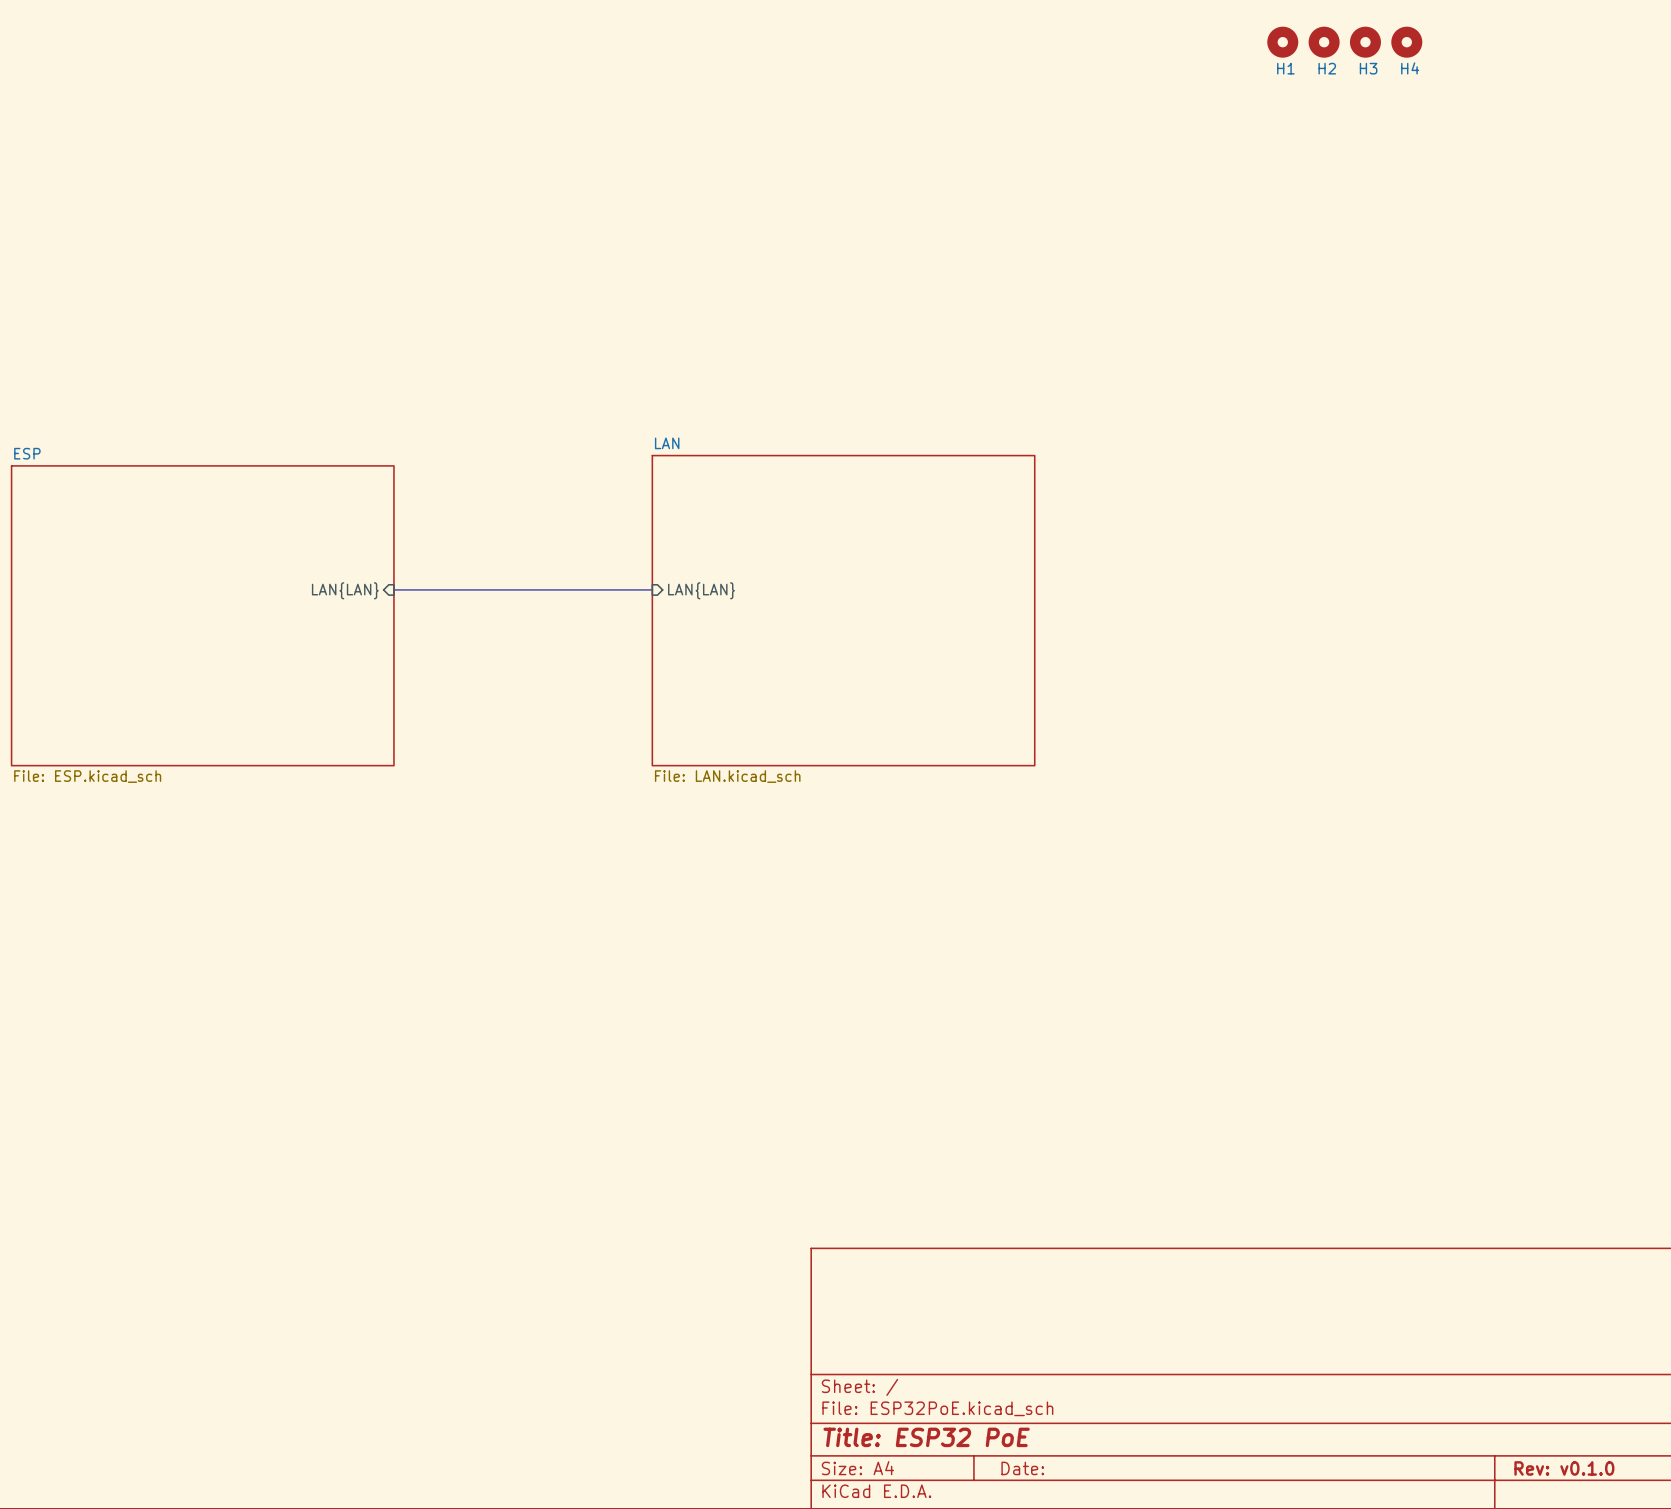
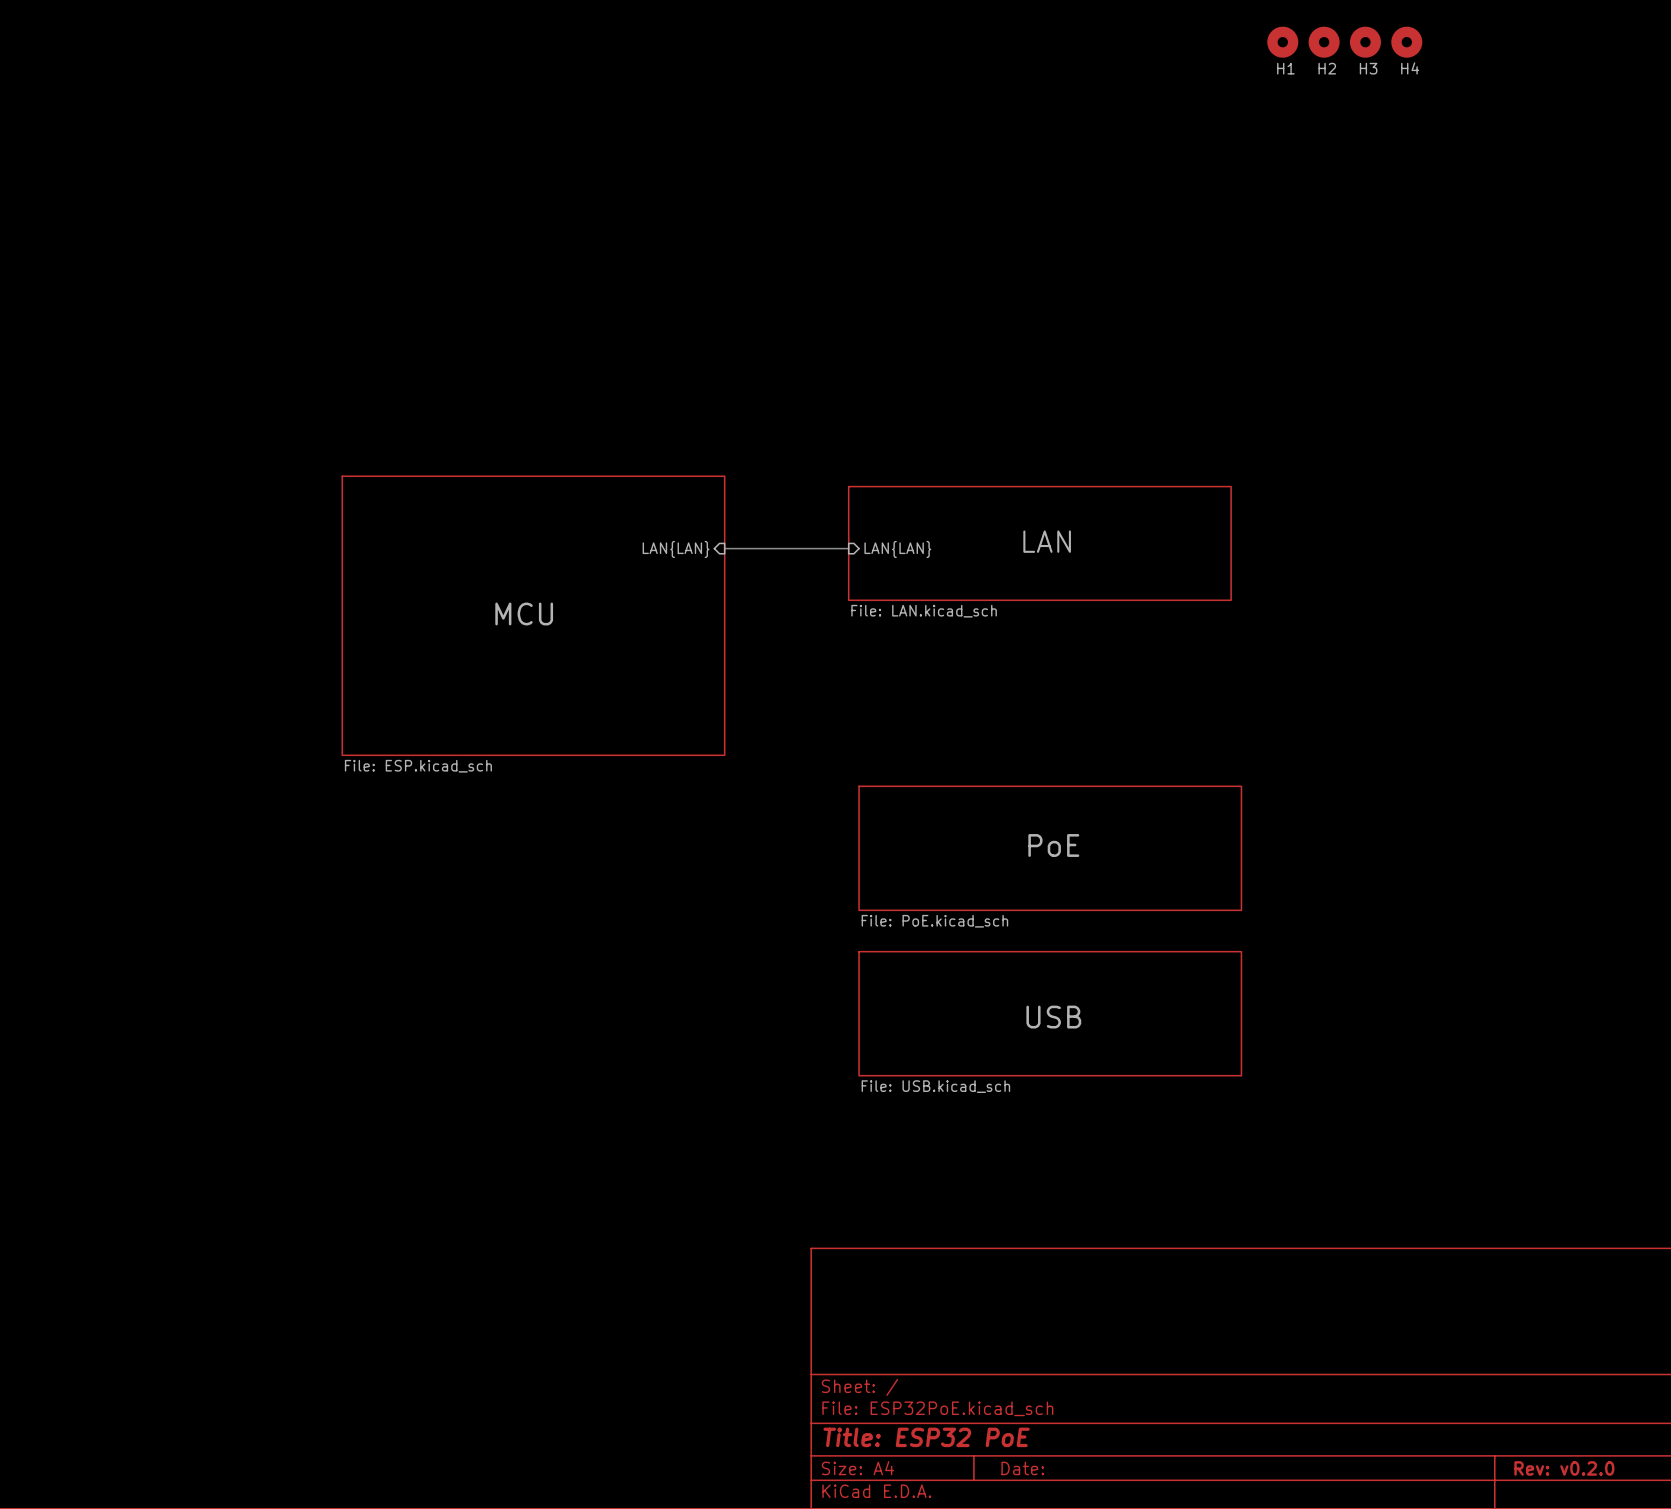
sheet LAN: none -> File: LAN.kicad_sch (1039, 543)
bus: none -> (724, 548) (848, 548)
sheet pin: none -> LAN{LAN} (897, 549)
bus: (393, 589) (652, 589) -> none
sheet pin: LAN{LAN} (345, 590) -> none
sheet pin rotation: 0° (701, 590) -> 180° (676, 549)
sheet LAN: File: LAN.kicad_sch (843, 610) -> none
sheet ESP: File: ESP.kicad_sch (202, 615) -> none
sheet MCU: none -> File: ESP.kicad_sch (533, 615)
sheet PoE: none -> File: PoE.kicad_sch (1050, 848)
sheet USB: none -> File: USB.kicad_sch (1050, 1013)
title block: Rev: v0.1.0 (1564, 1468) -> Rev: v0.2.0 (1564, 1468)

